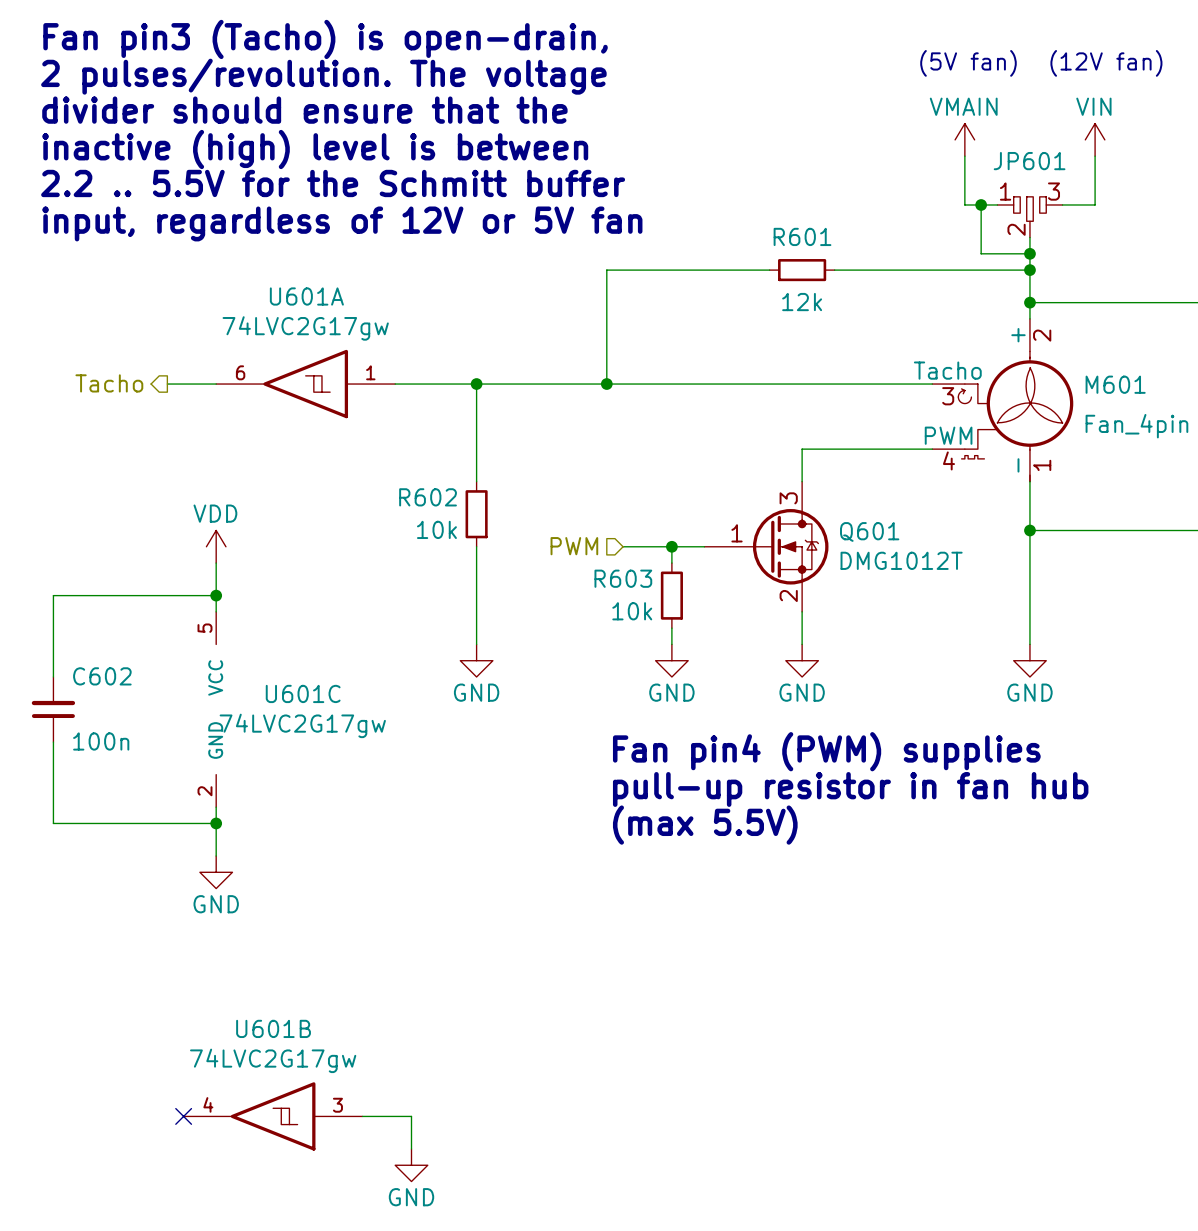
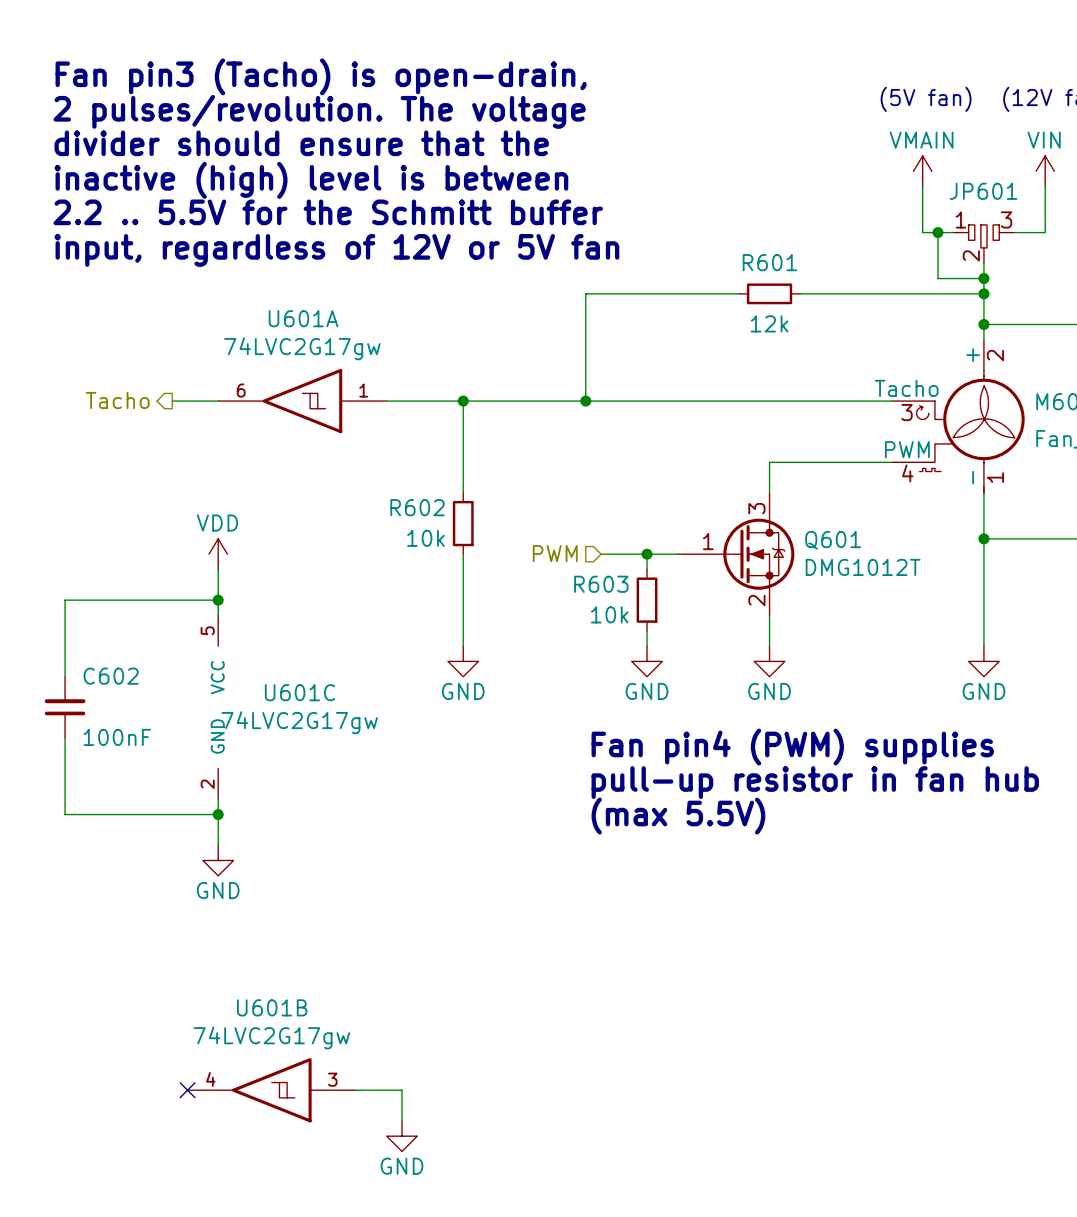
C602 value: 100n (101, 741) -> 100nF (117, 737)

